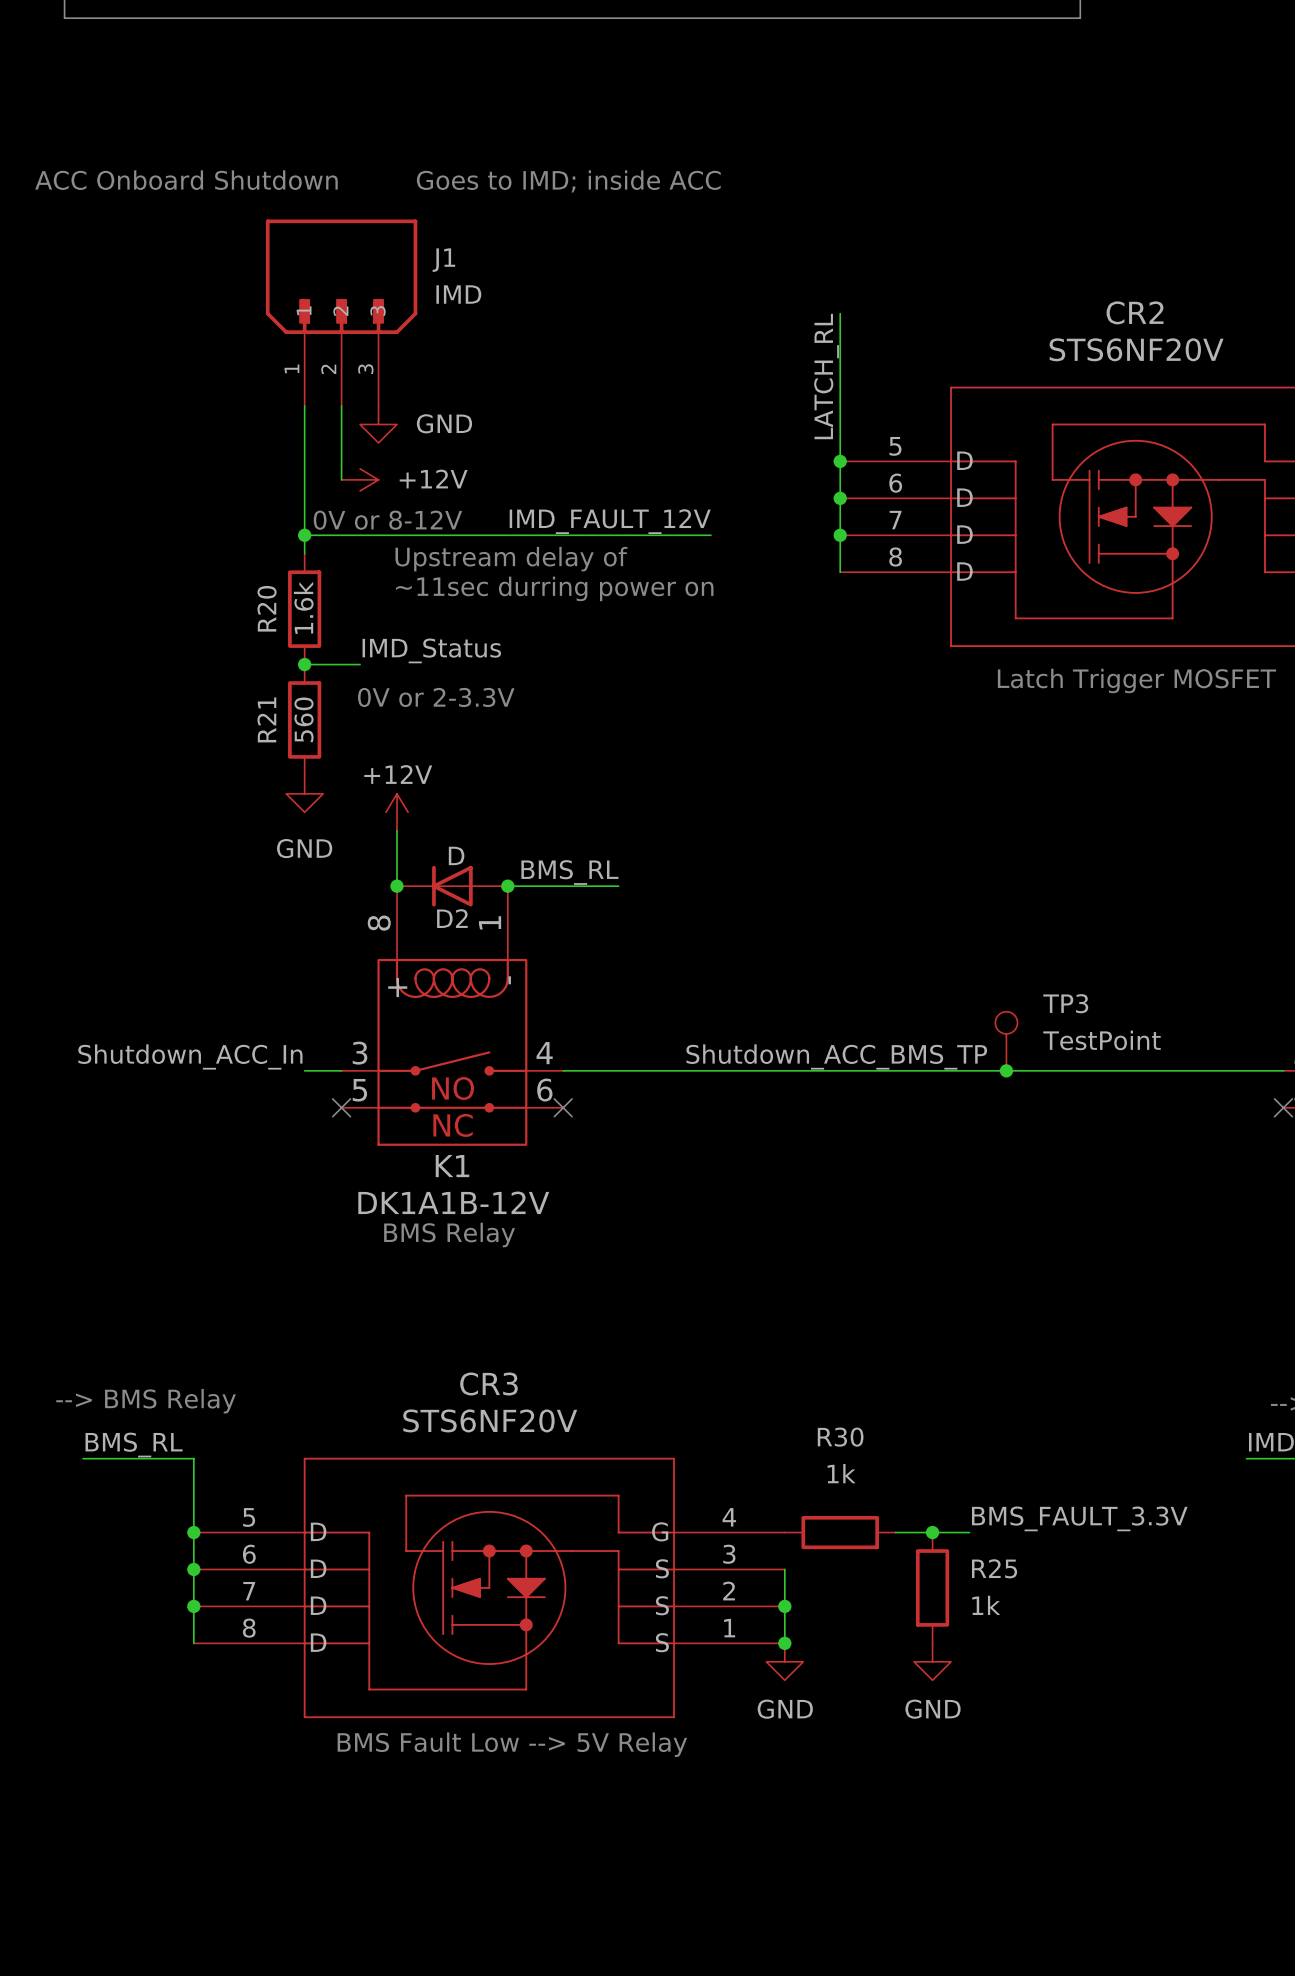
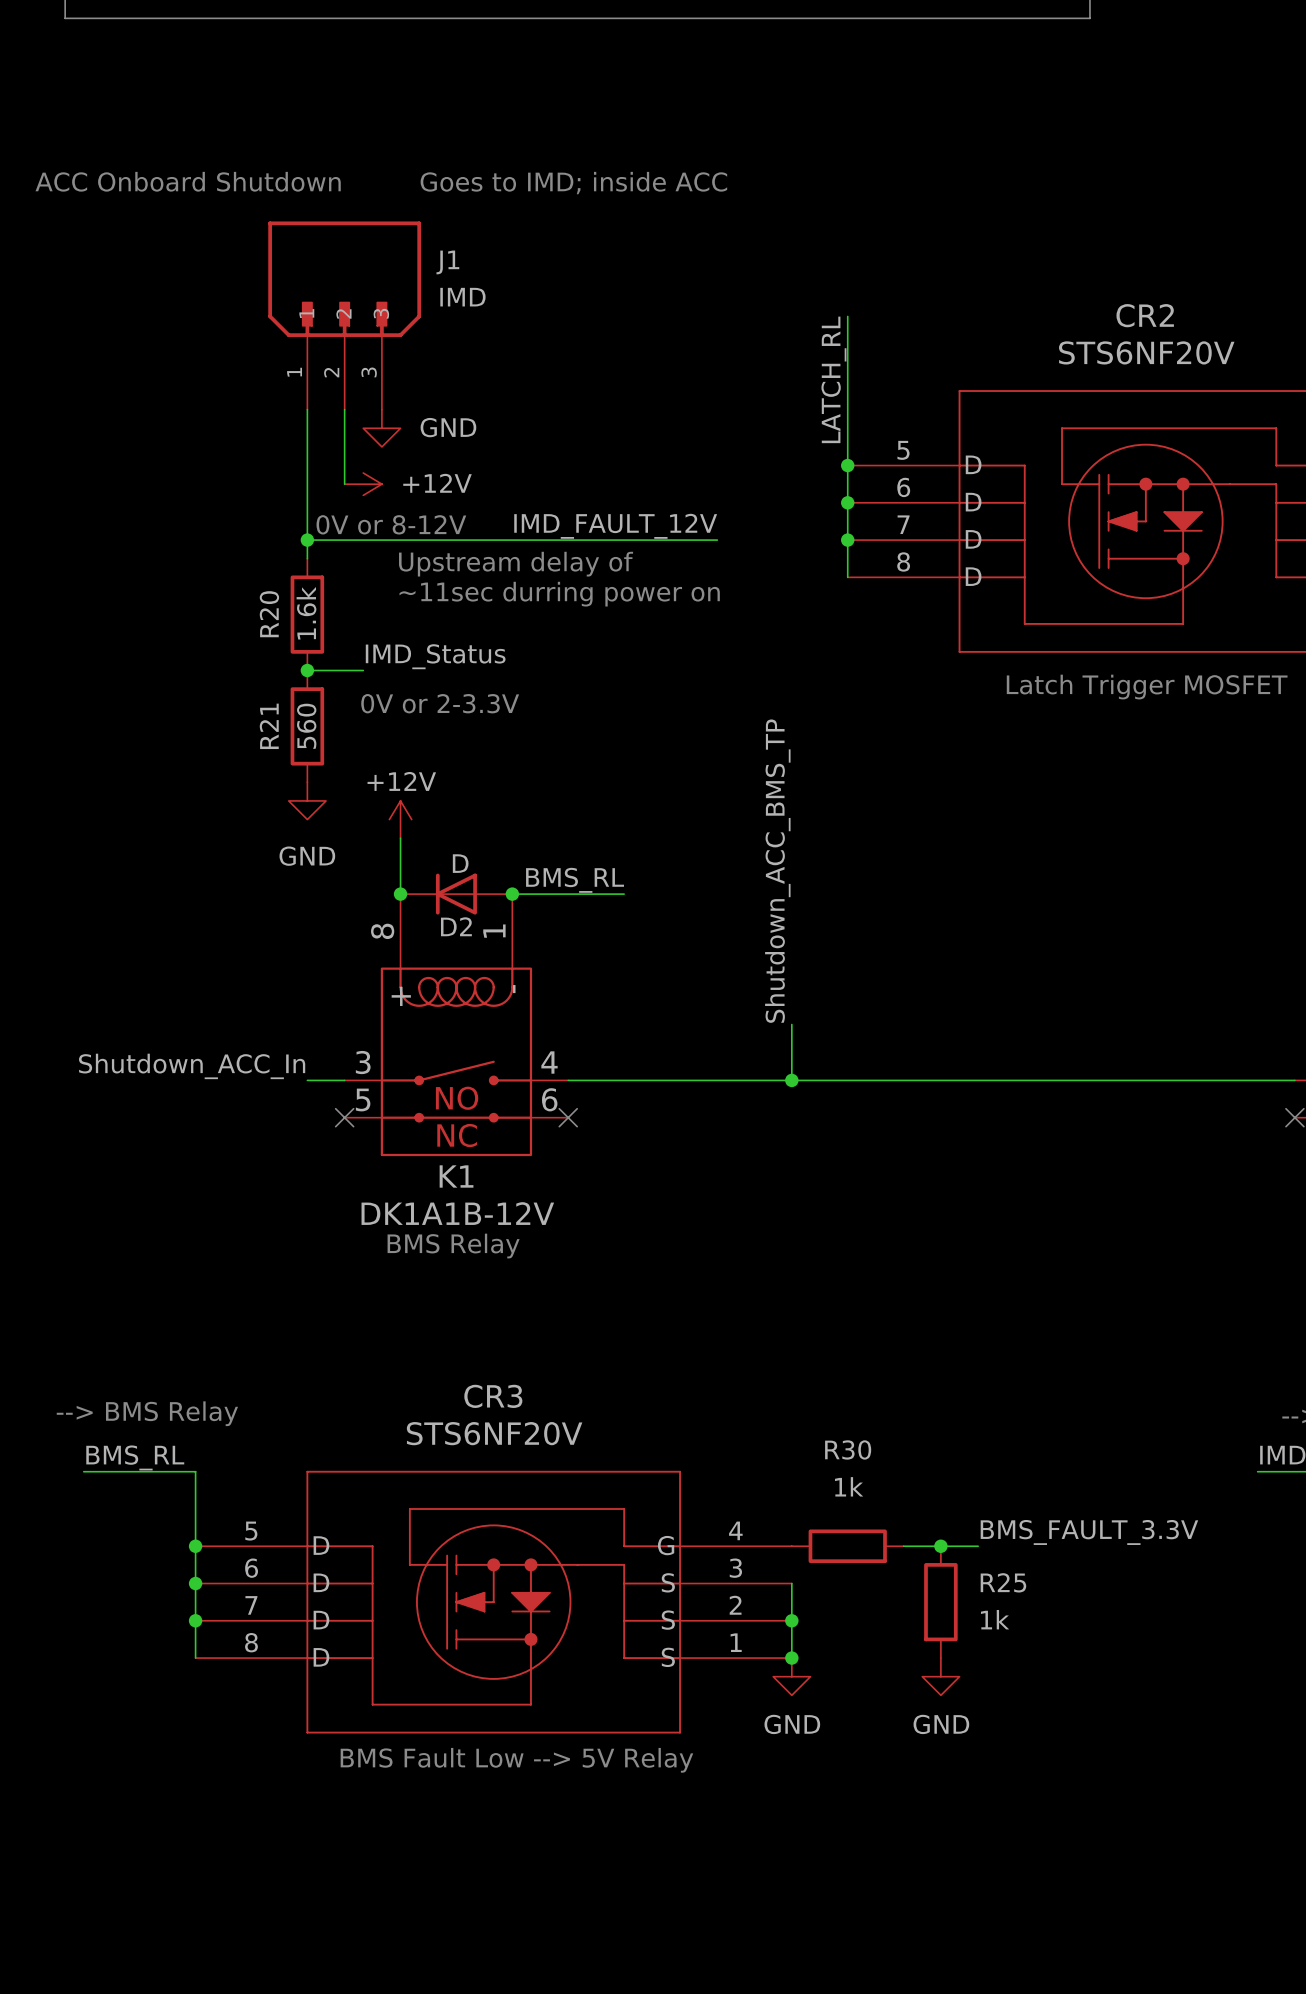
wire: none -> (791, 1024) (791, 1080)
TP3: TestPoint (1006, 1041) -> none
label rotation: 0° (836, 1056) -> 90° counterclockwise (777, 871)
junction: none -> (791, 1080)
junction: (1006, 1070) -> none

